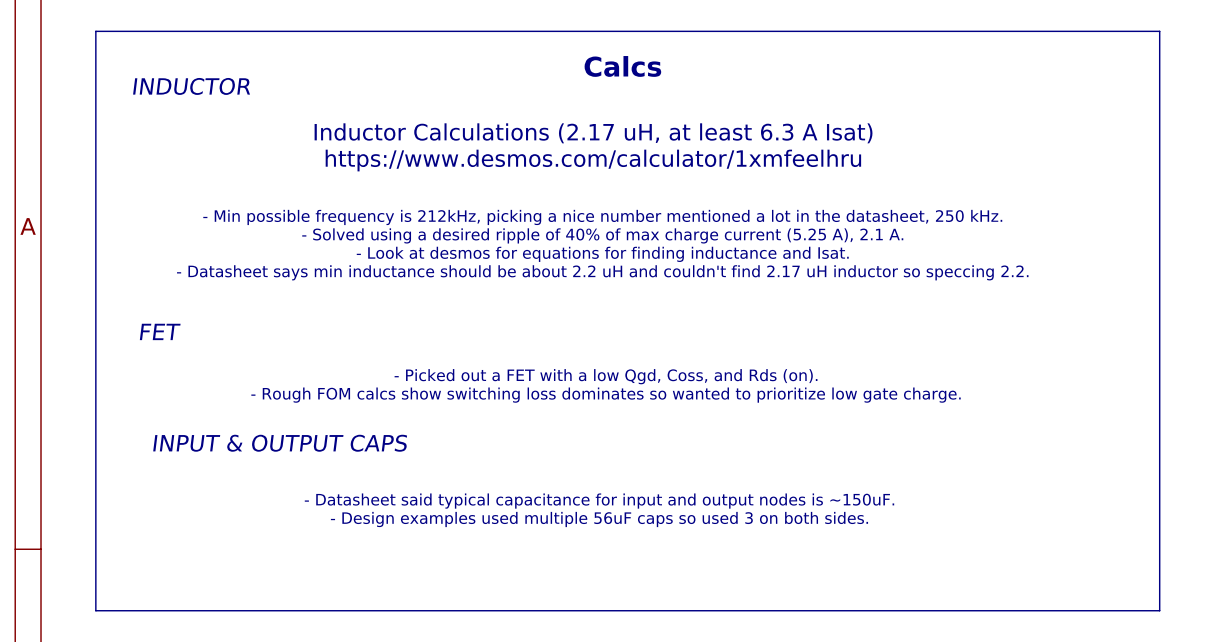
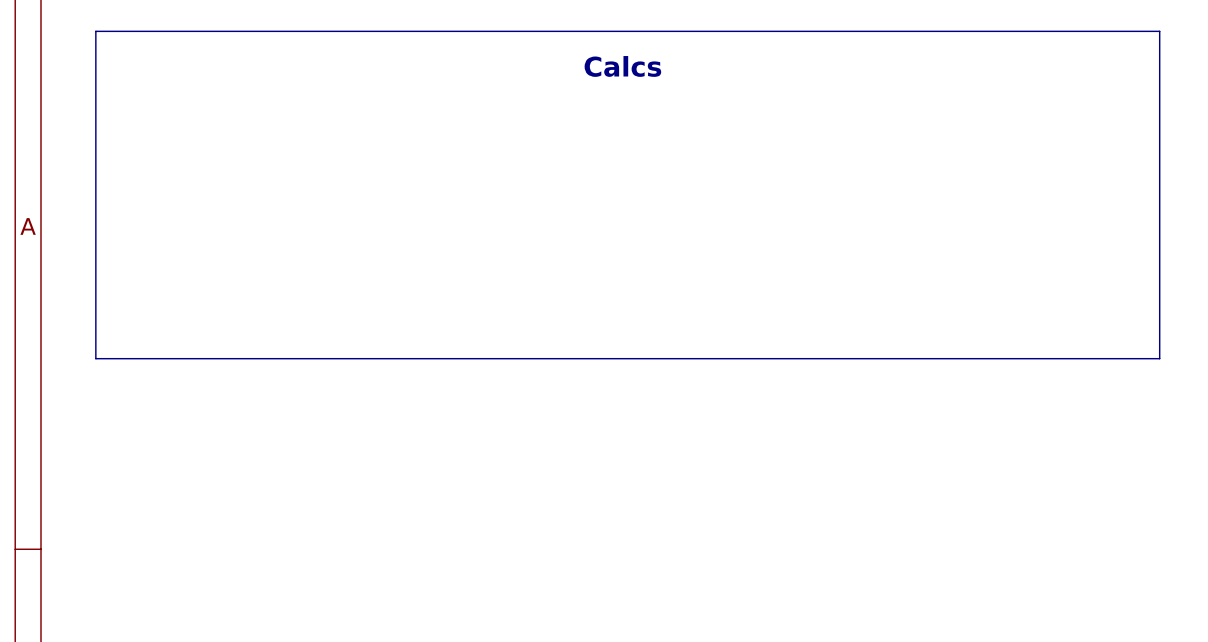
text: INDUCTOR (191, 86) -> none
text: Inductor Calculations (2.17 uH, at least 6.3 A Isat) (593, 133) -> none
text: https://www.desmos.com/calculator/1xmfeelhru (593, 160) -> none
text: - Min possible frequency is 212kHz, picking a nice number mentioned a lot in the datasheet, 250 kHz. (602, 217) -> none
text: - Solved using a desired ripple of 40% of max charge current (5.25 A), 2.1 A. (602, 235) -> none
text: - Look at desmos for equations for finding inductance and Isat. (602, 254) -> none
text: - Datasheet says min inductance should be about 2.2 uH and couldn't find 2.17 uH inductor so speccing 2.2. (602, 272) -> none
text: FET (160, 331) -> none
line: (95, 358) (95, 610) (1159, 610) (1159, 358) -> (95, 358) (1159, 358)
text: - Picked out a FET with a low Qgd, Coss, and Rds (on). (606, 376) -> none
text: - Rough FOM calcs show switching loss dominates so wanted to prioritize low gate charge. (606, 395) -> none
text: INPUT & OUTPUT CAPS (280, 443) -> none
text: - Datasheet said typical capacitance for input and output nodes is ~150uF. (599, 501) -> none
text: - Design examples used multiple 56uF caps so used 3 on both sides. (599, 519) -> none

